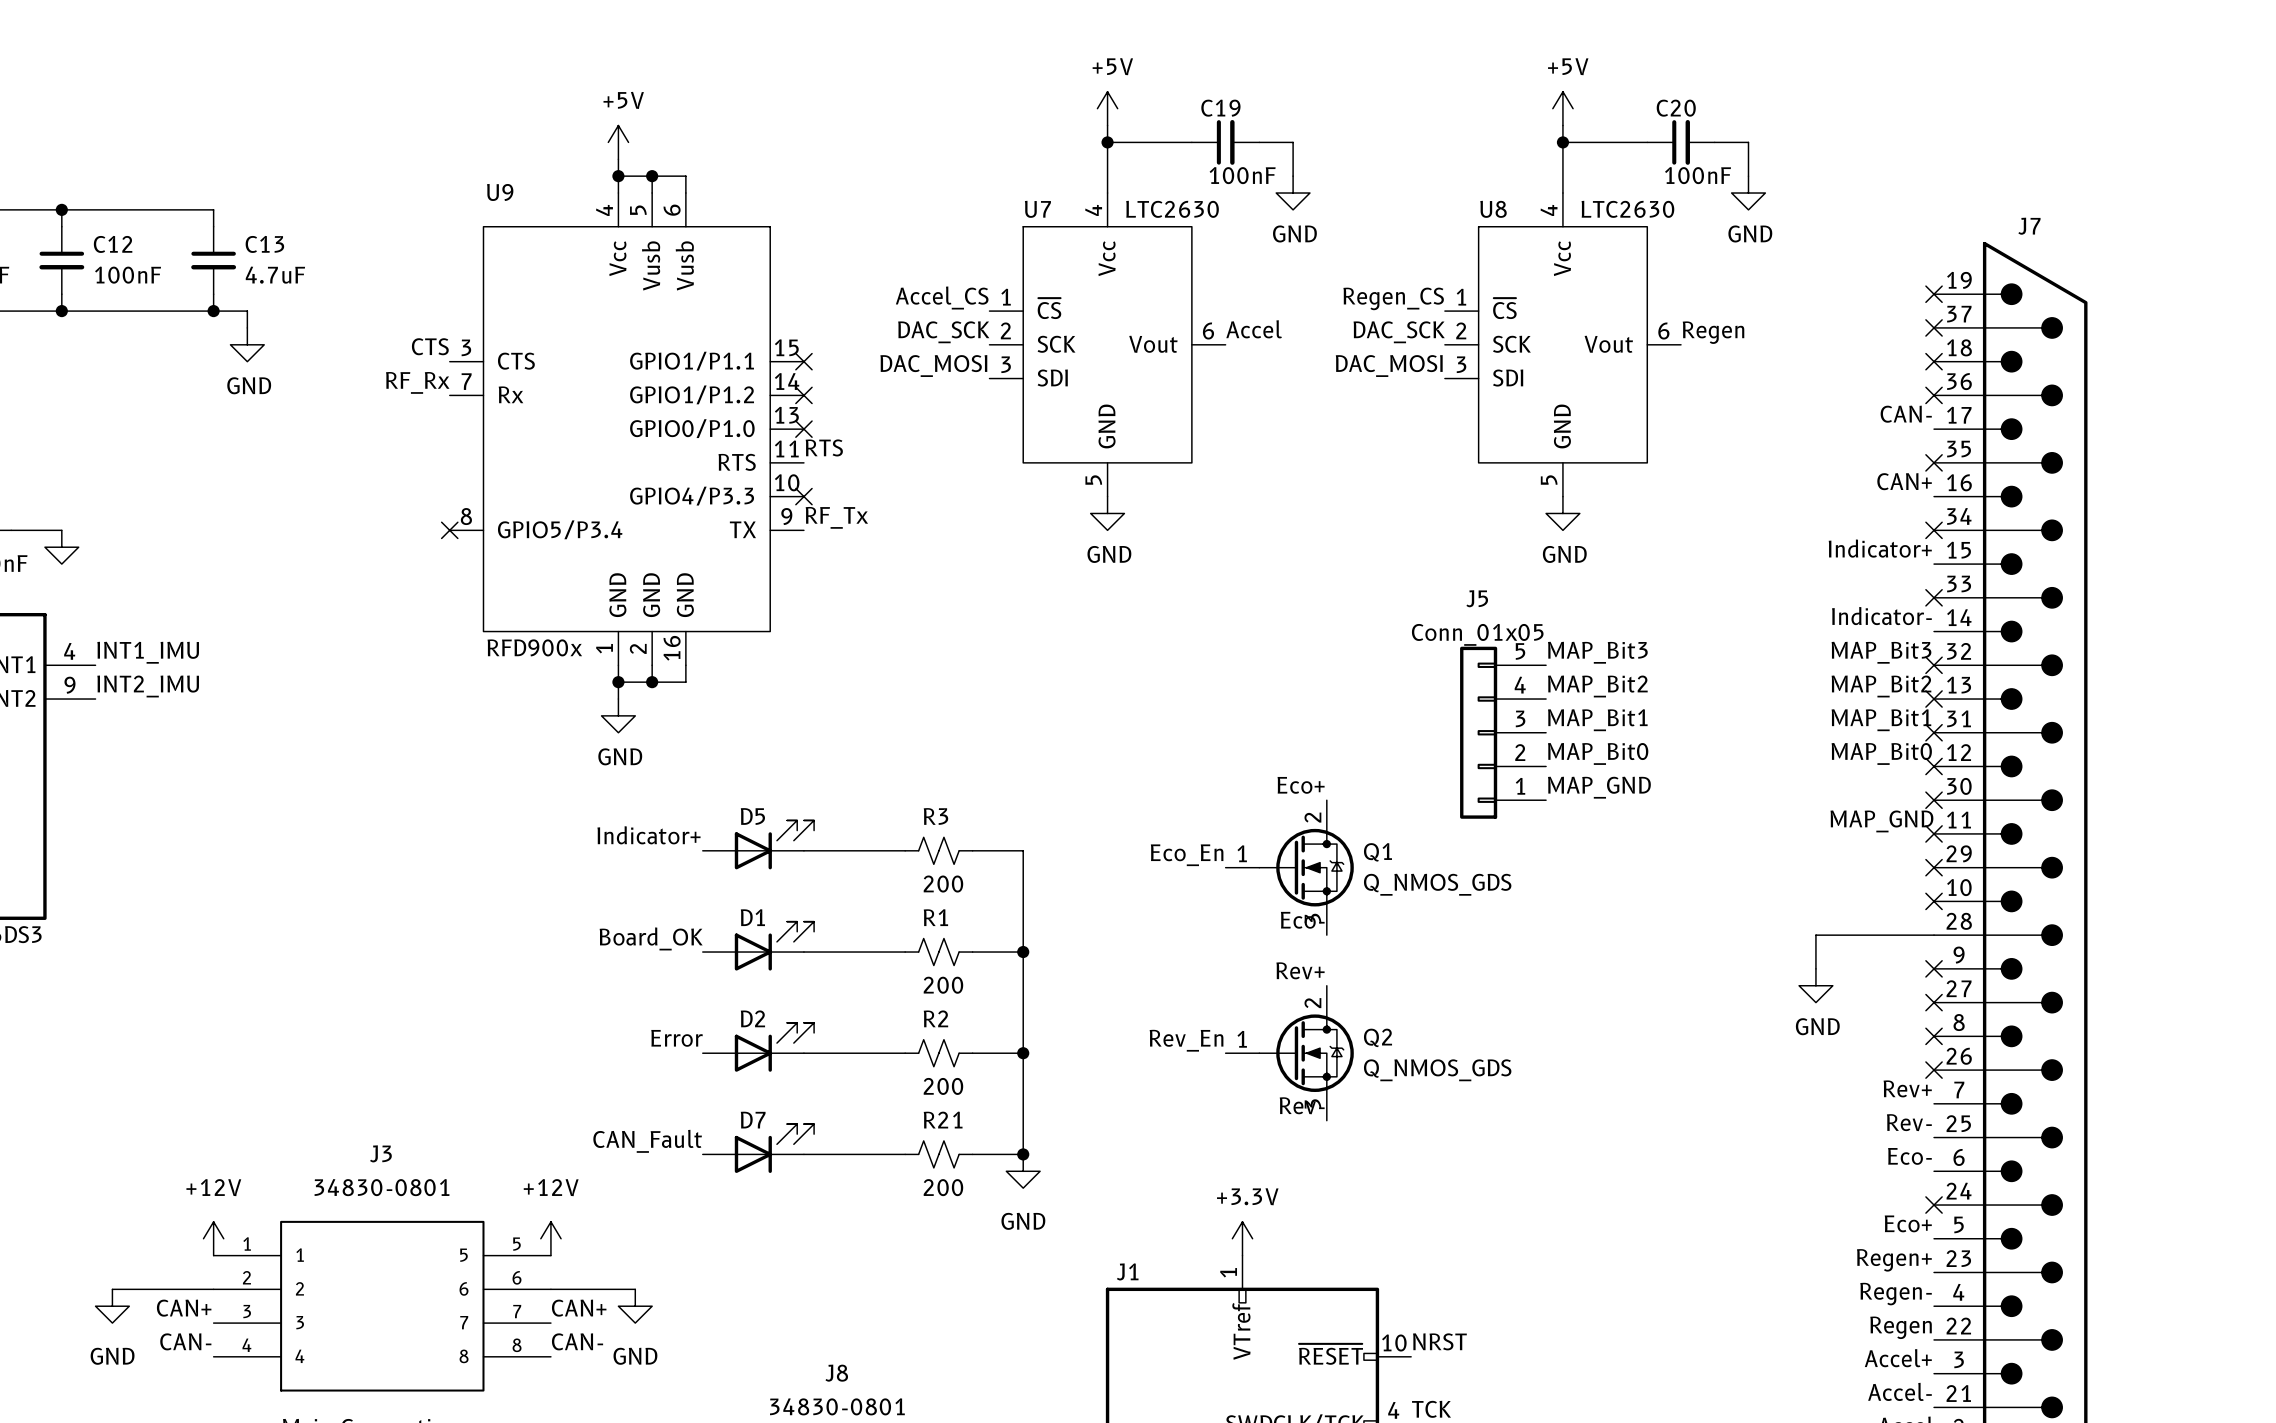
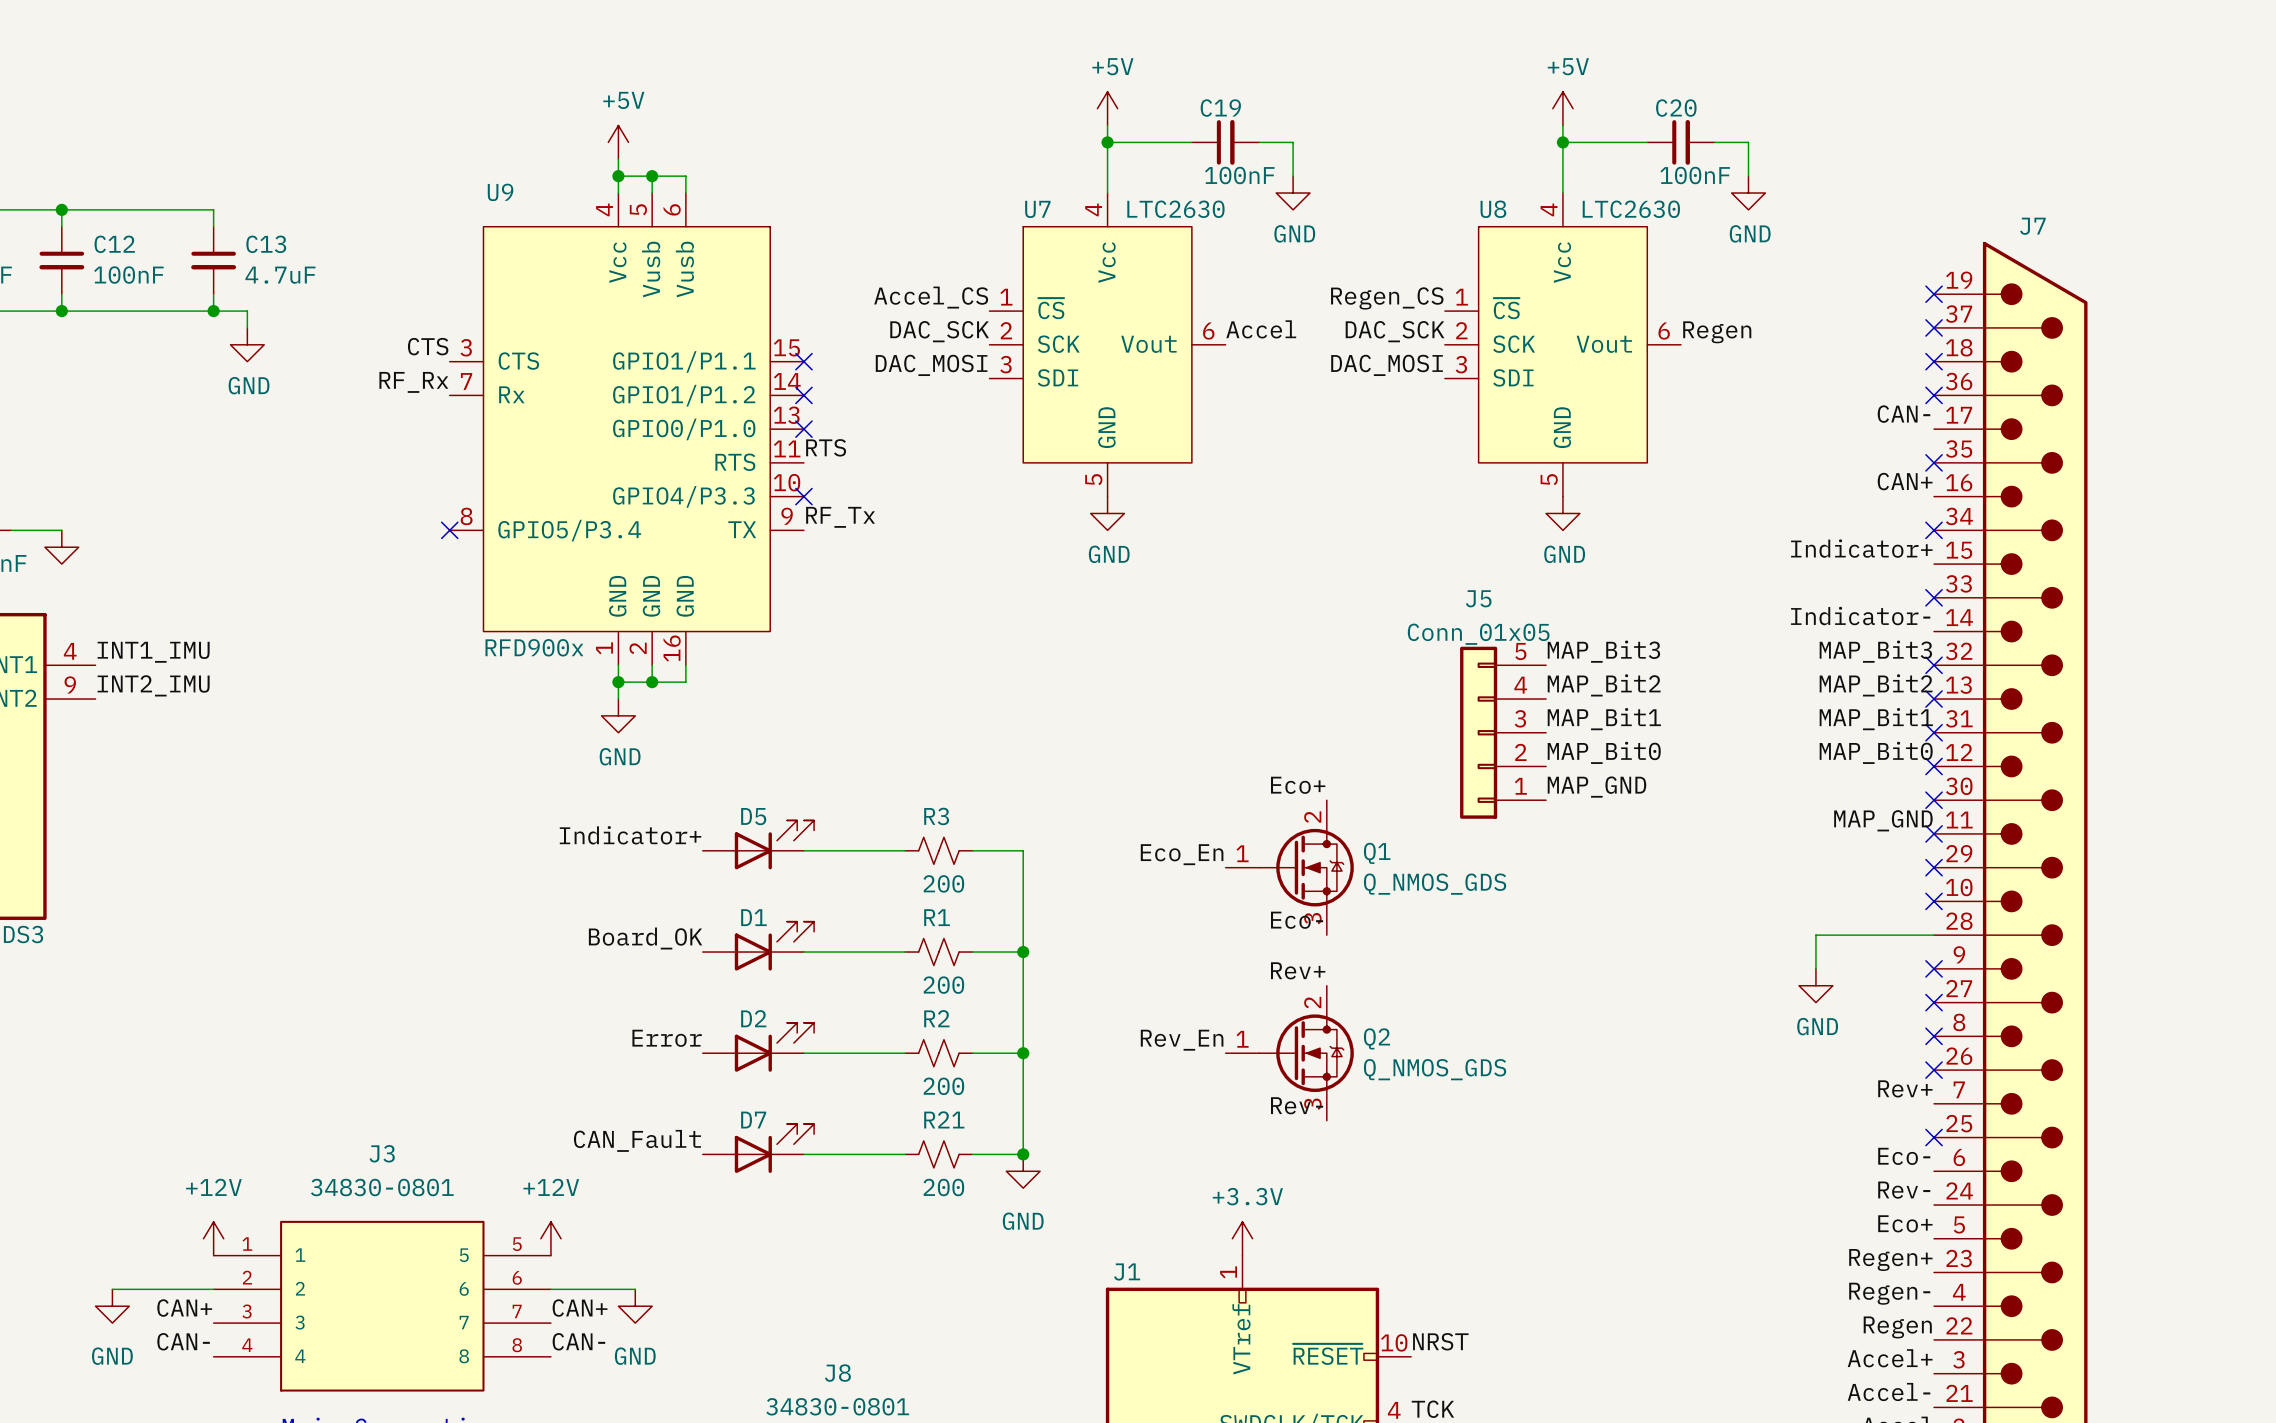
label position: Rev- (1909, 1122) -> Rev- (1904, 1190)
no-connect mark position: (1934, 1205) -> (1934, 1137)

